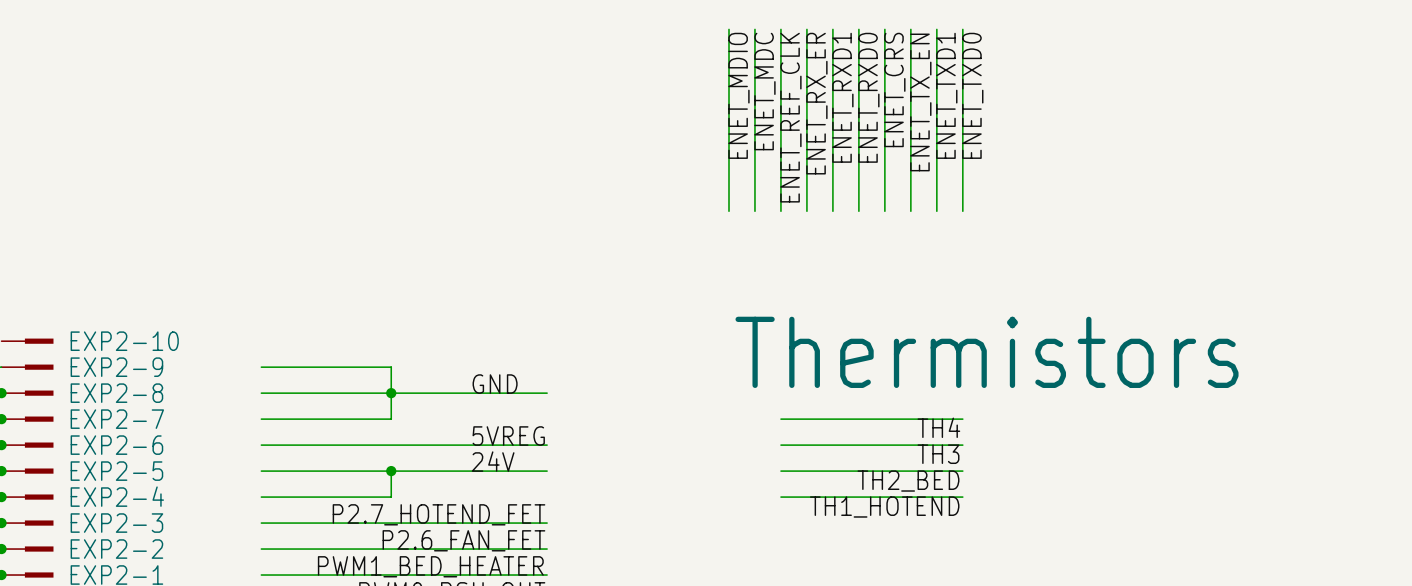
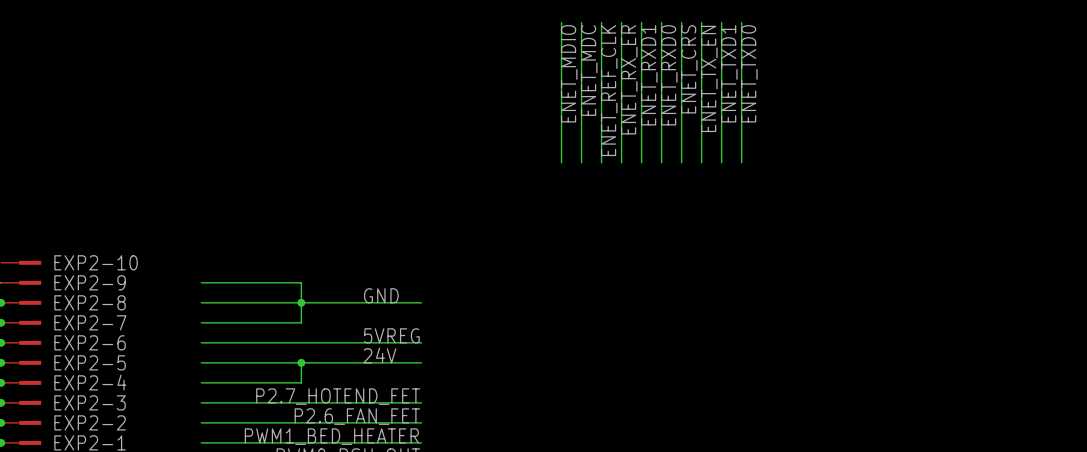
text: Thermistors (987, 352) -> none
wire: (780, 419) (962, 419) -> none
label: TH4 (938, 427) -> none
wire: (780, 445) (962, 445) -> none
label: TH3 (938, 454) -> none
wire: (780, 471) (962, 471) -> none
label: TH2_BED (908, 481) -> none
wire: (780, 497) (962, 497) -> none
label: TH1_HOTEND (884, 507) -> none

